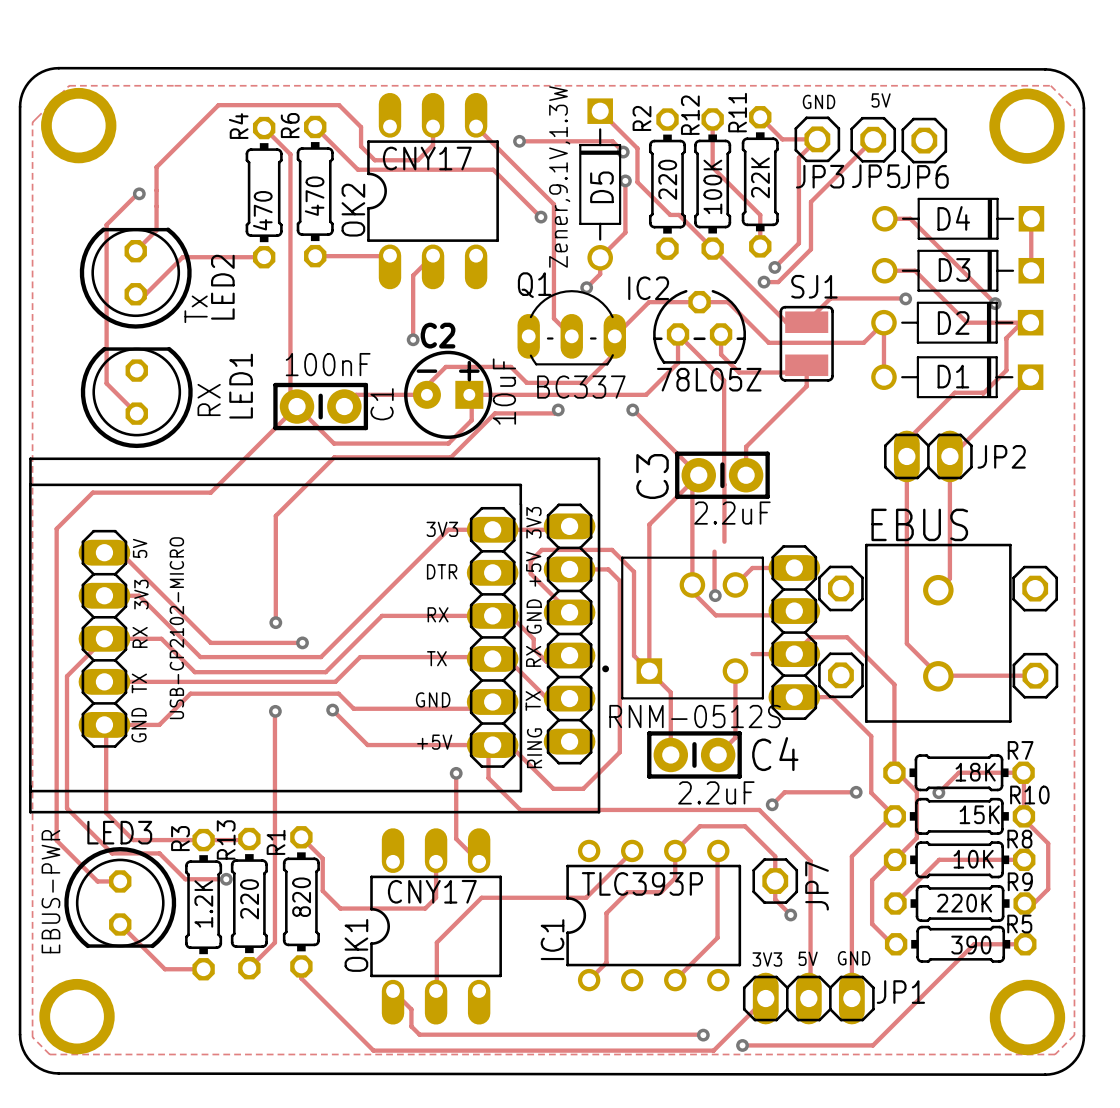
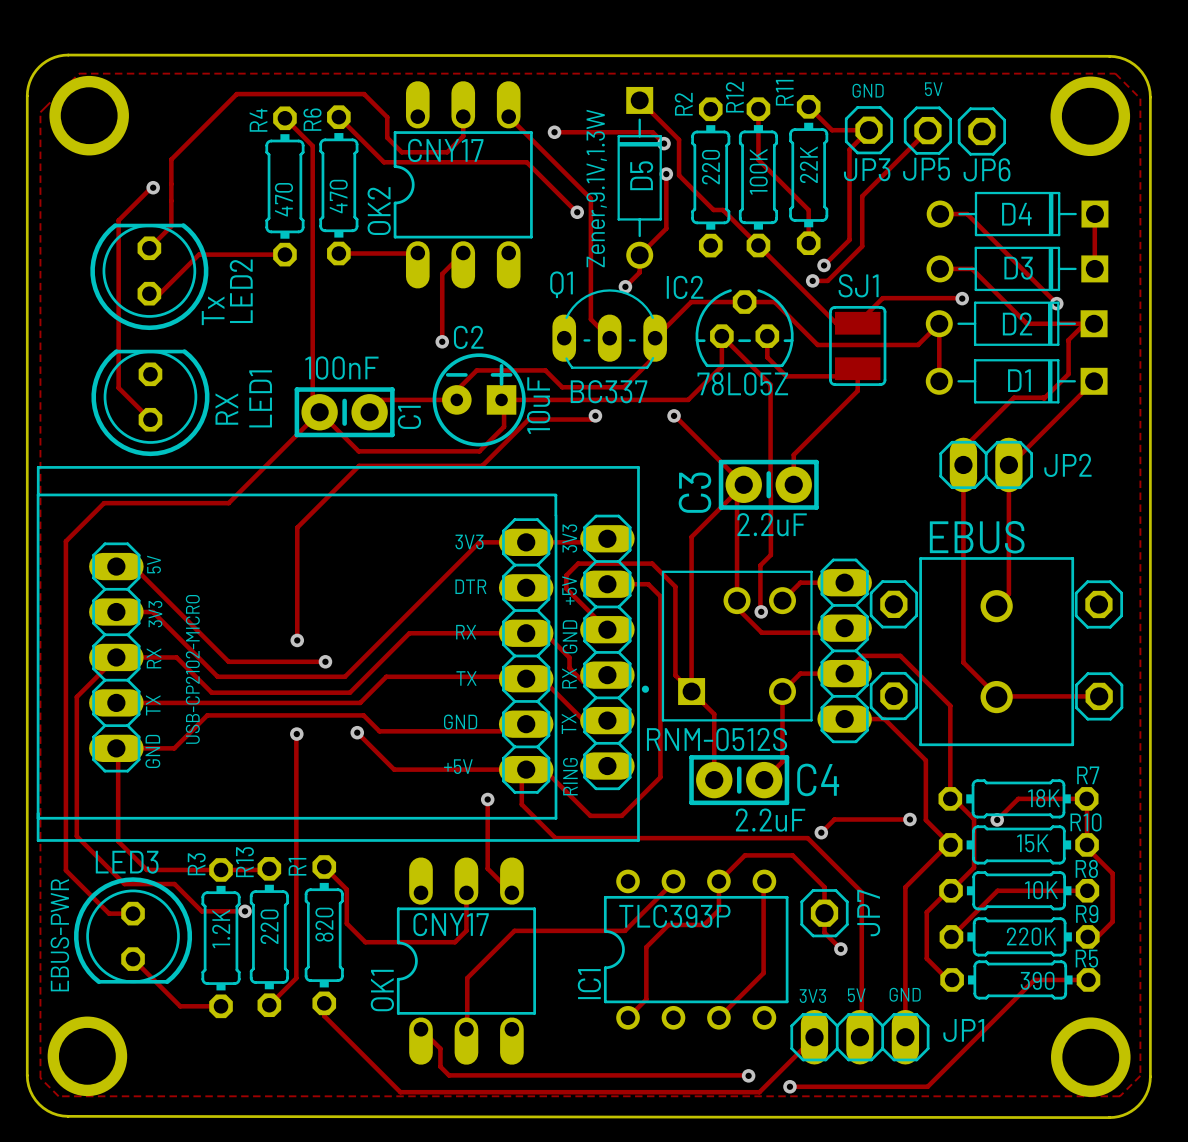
track: none -> (770, 554) (760, 565)
track: none -> (800, 673) (782, 691)

